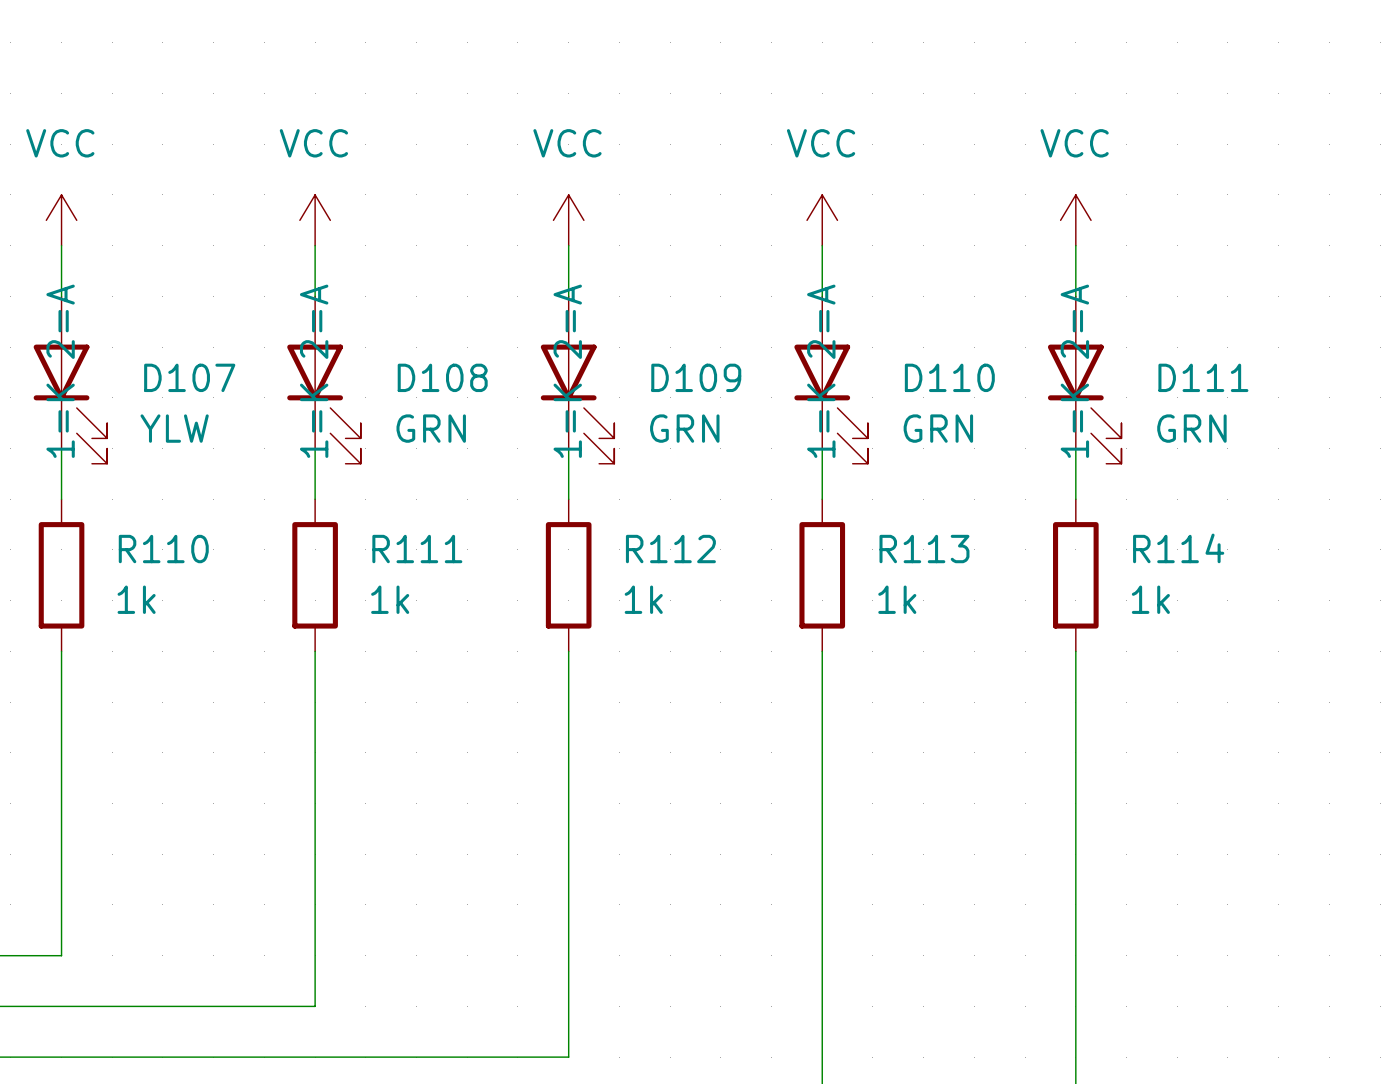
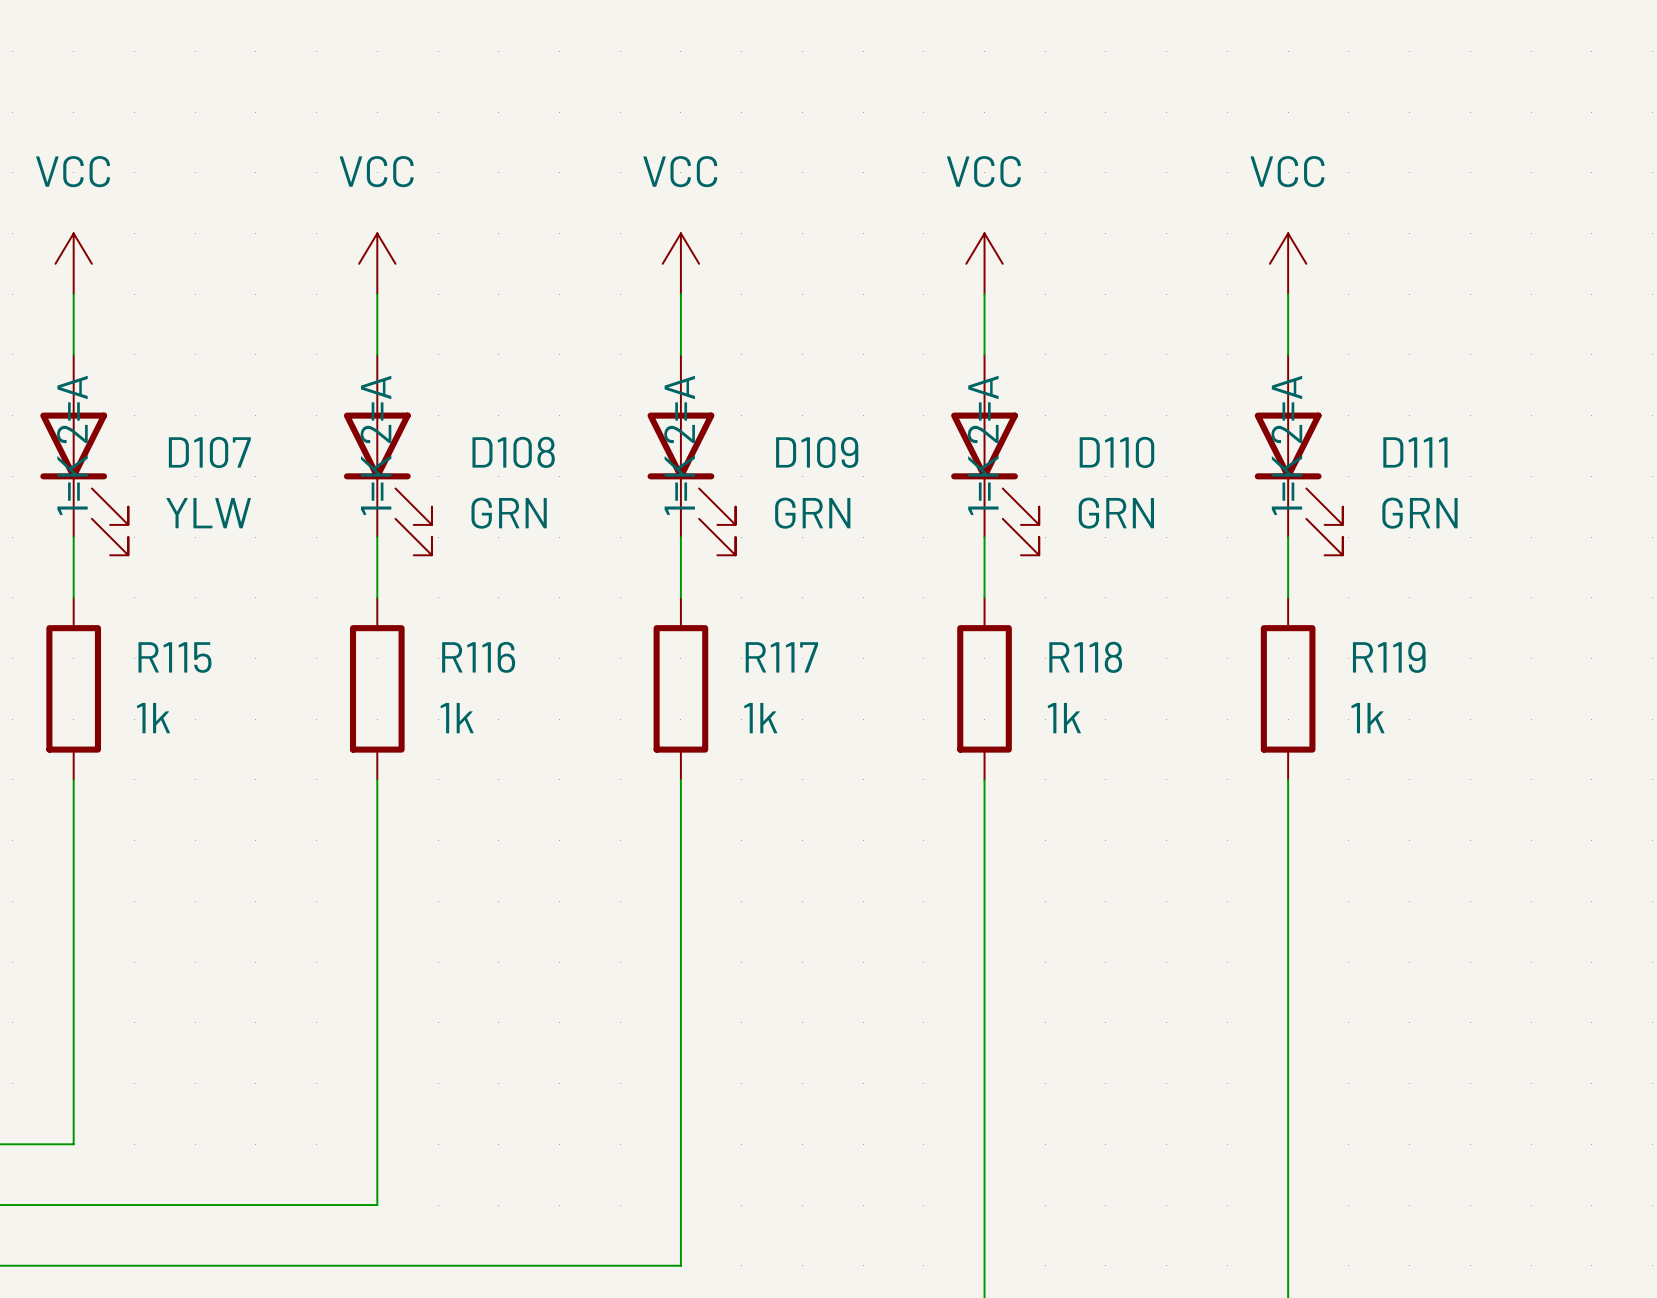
R114 name: R114 (1178, 548) -> R119 (1389, 657)
R110 name: R110 (163, 549) -> R115 (174, 657)
R111 name: R111 (417, 549) -> R116 (478, 657)
R112 name: R112 (670, 549) -> R117 (781, 657)
R113 name: R113 (924, 549) -> R118 (1085, 657)

